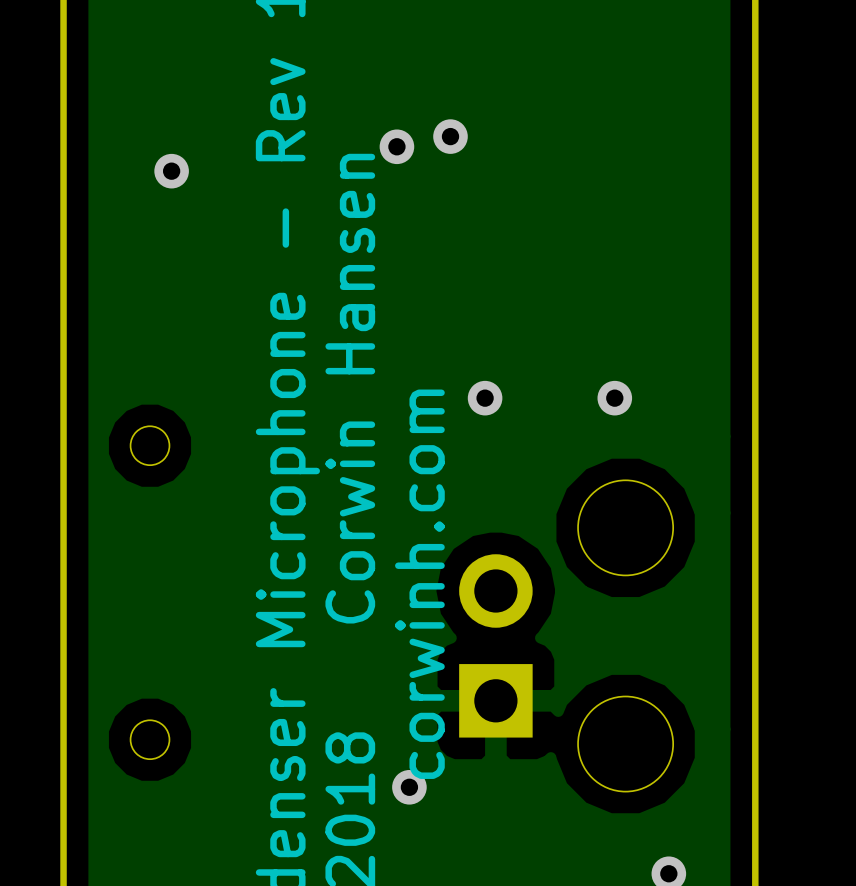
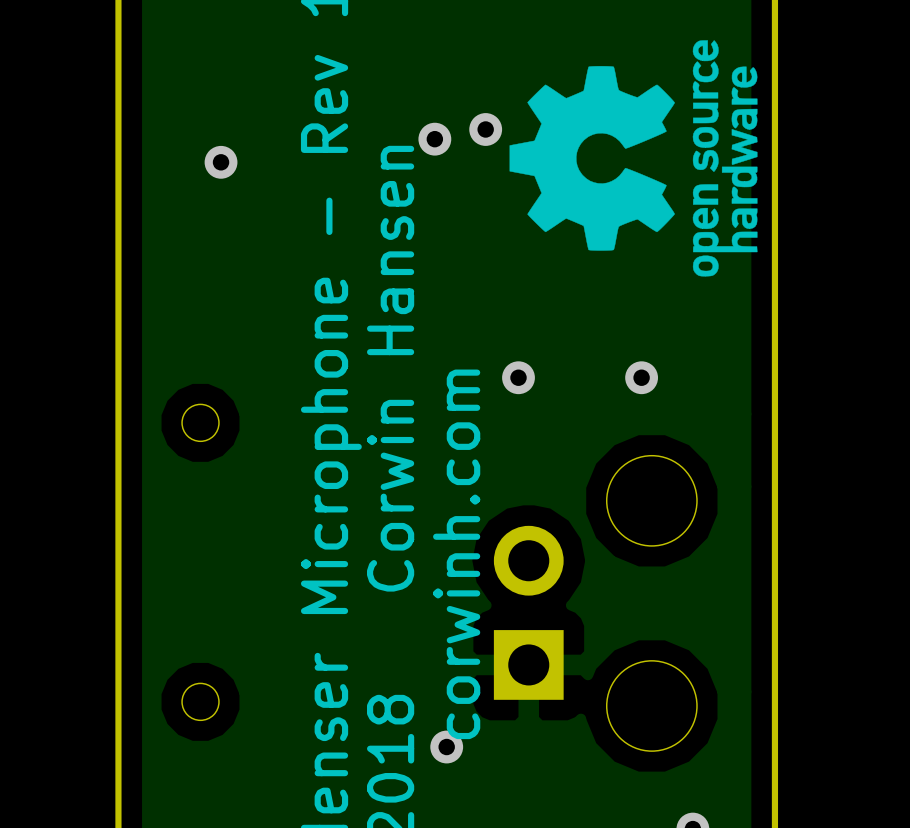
drawing: none -> [509, 40, 758, 277]

